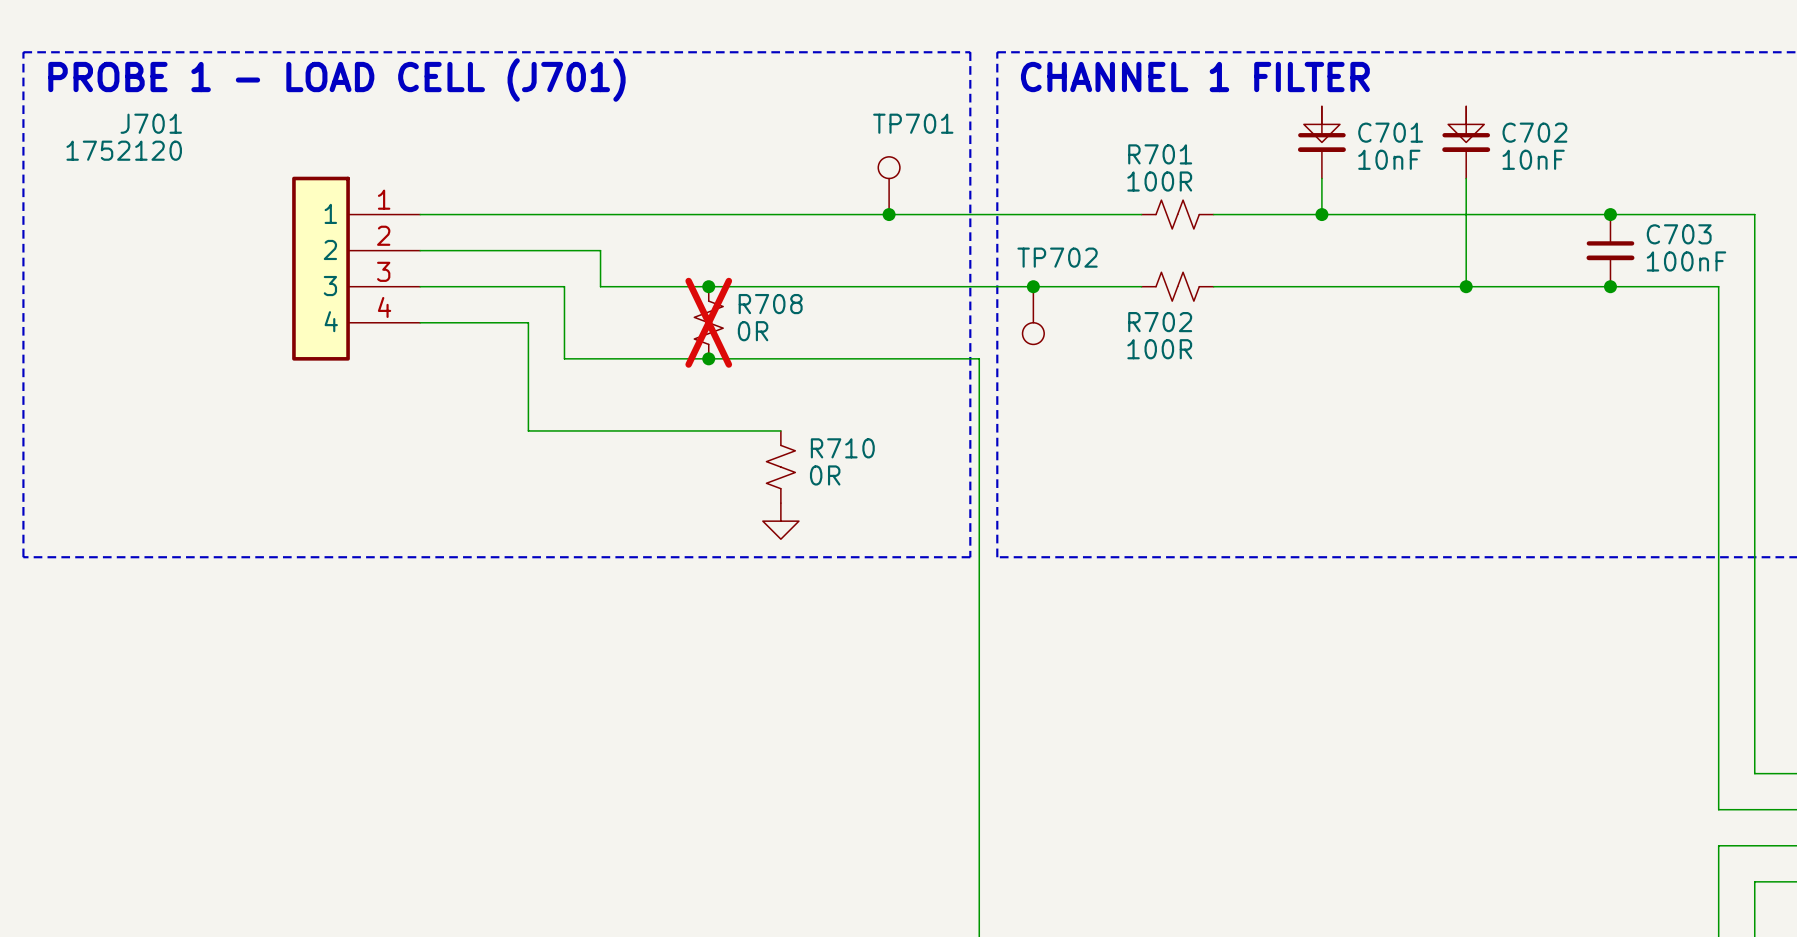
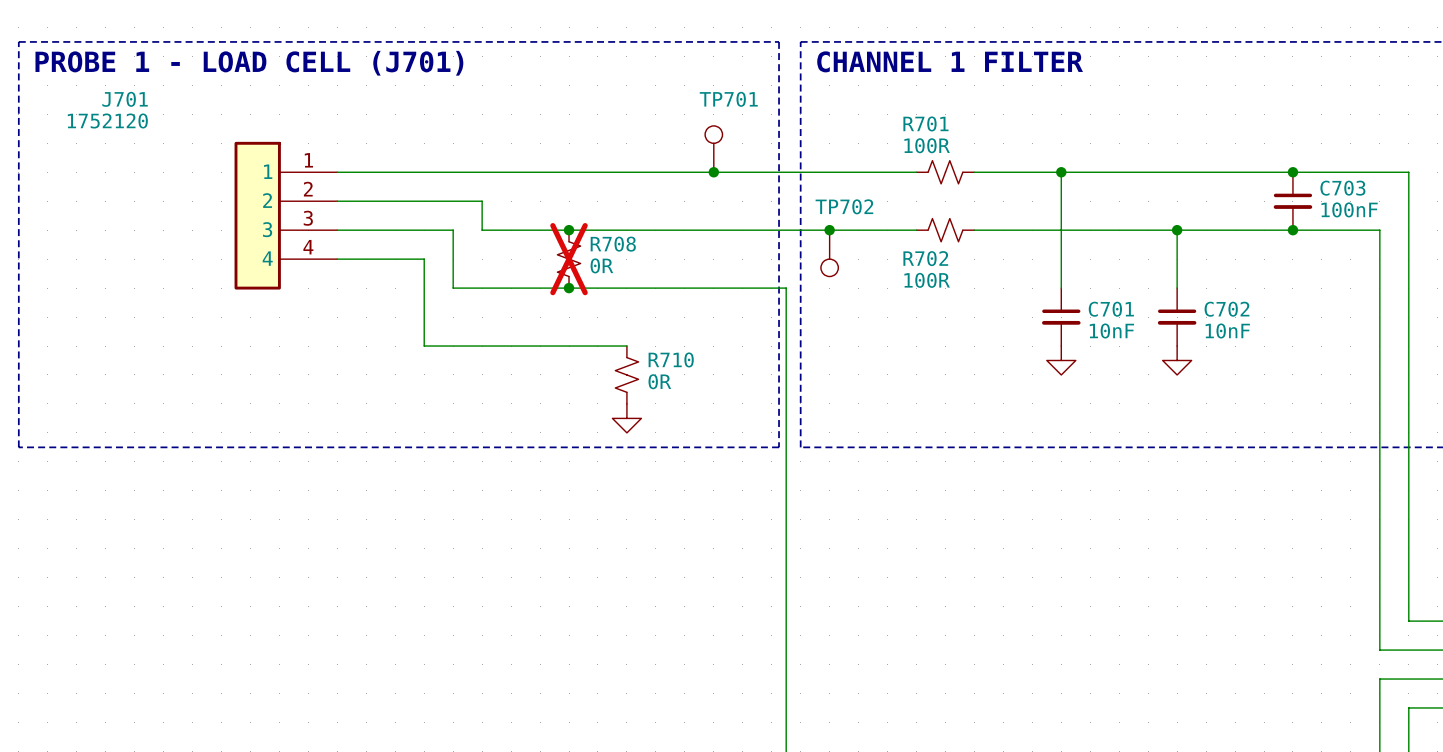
power symbol: (1321, 124) -> none
power symbol: (1466, 124) -> none
C701 position: (1321, 142) -> (1061, 317)
C702 position: (1466, 142) -> (1177, 317)
wire: (1321, 178) (1321, 214) -> (1061, 288) (1061, 172)
wire: (1466, 178) (1466, 286) -> (1177, 288) (1177, 230)
power symbol: none -> (1061, 360)
power symbol: none -> (1177, 360)

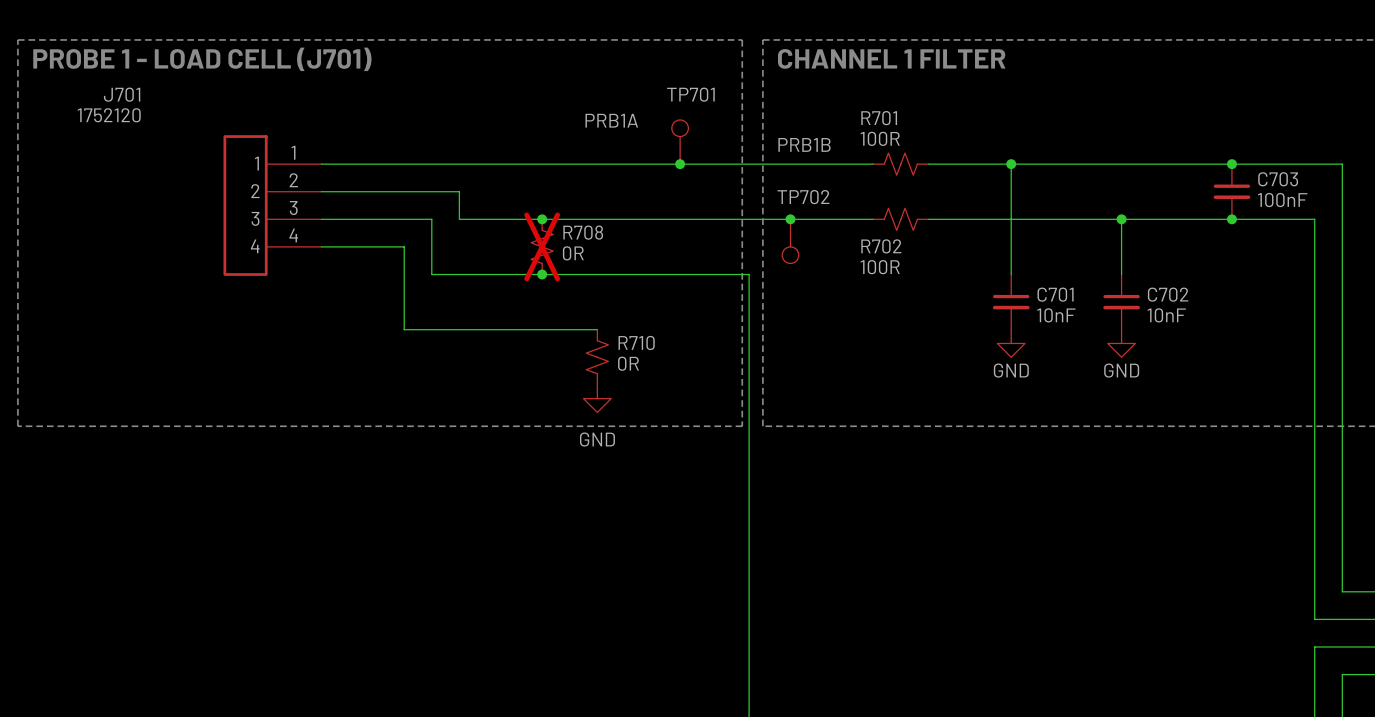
TP701 value: none -> PRB1A (611, 120)
TP702 value: none -> PRB1B (804, 144)
power symbol text: none -> GND (1011, 370)
power symbol text: none -> GND (1121, 370)
power symbol text: none -> GND (597, 439)

